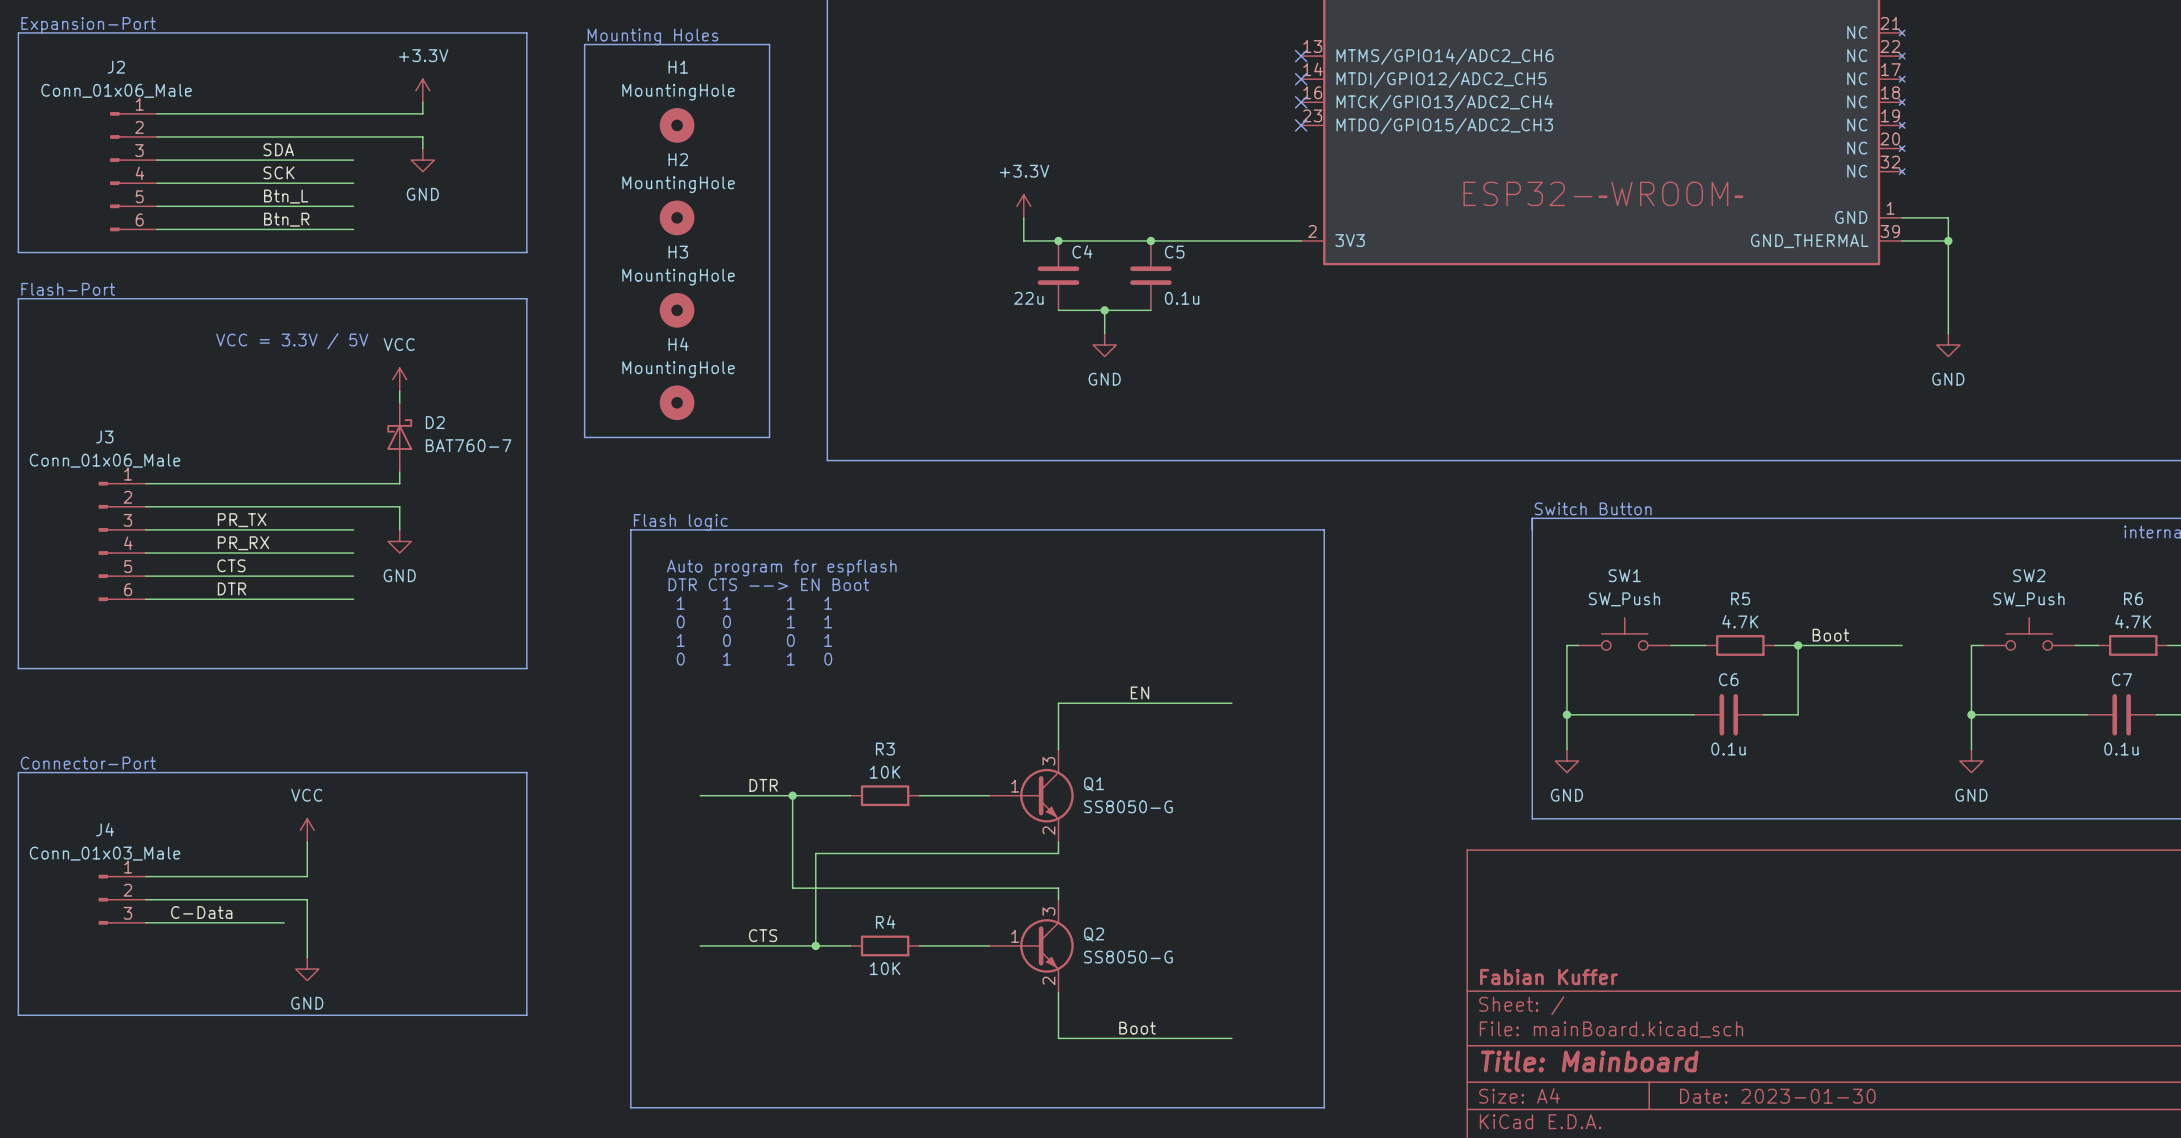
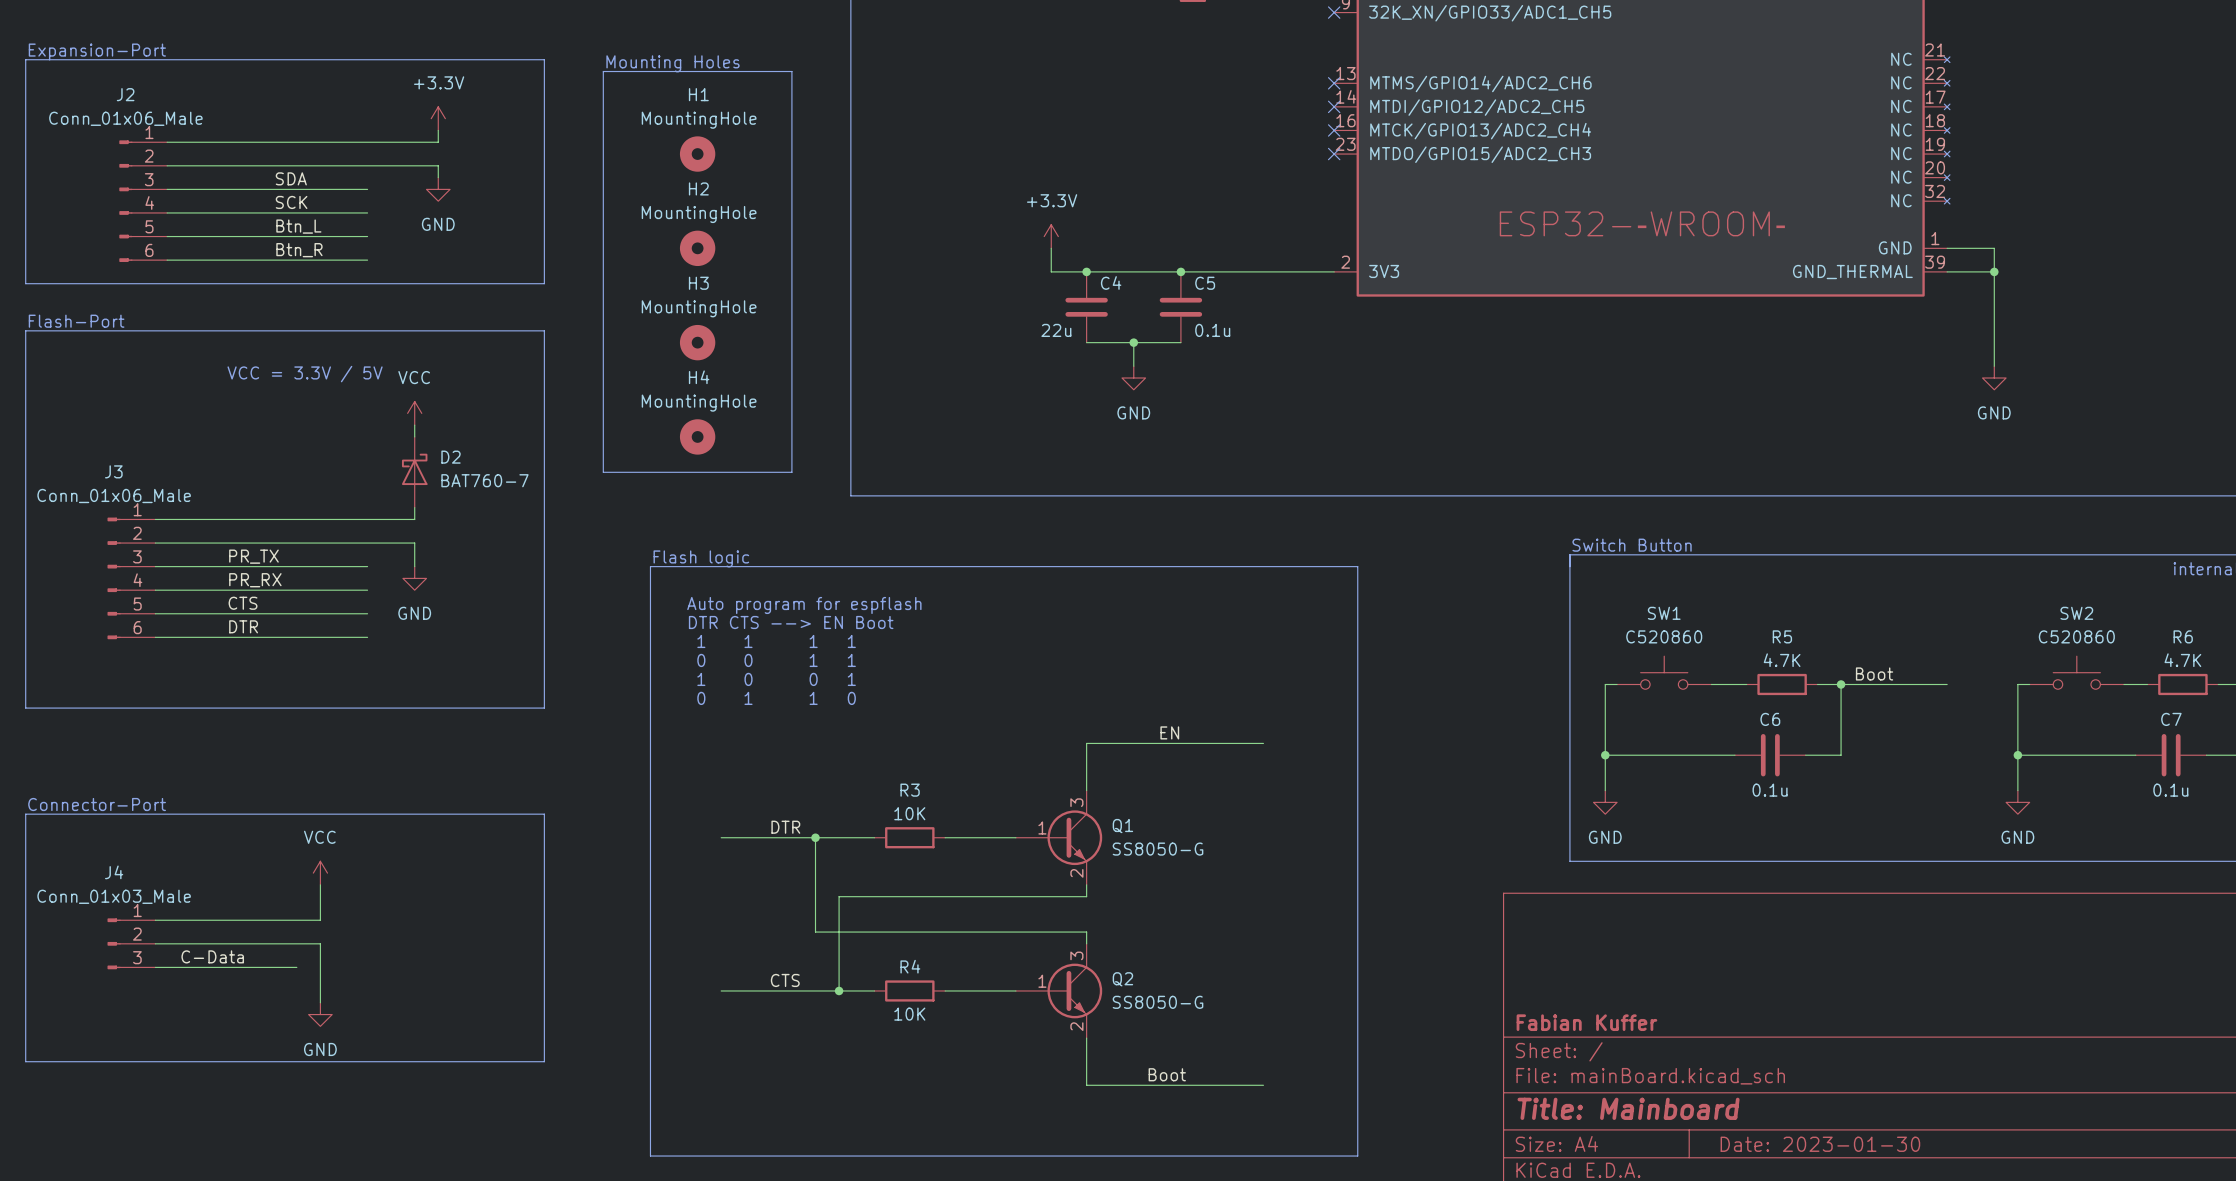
SW1 value: SW_Push (1624, 599) -> C520860 (1664, 636)
SW2 value: SW_Push (2028, 599) -> C520860 (2076, 636)

